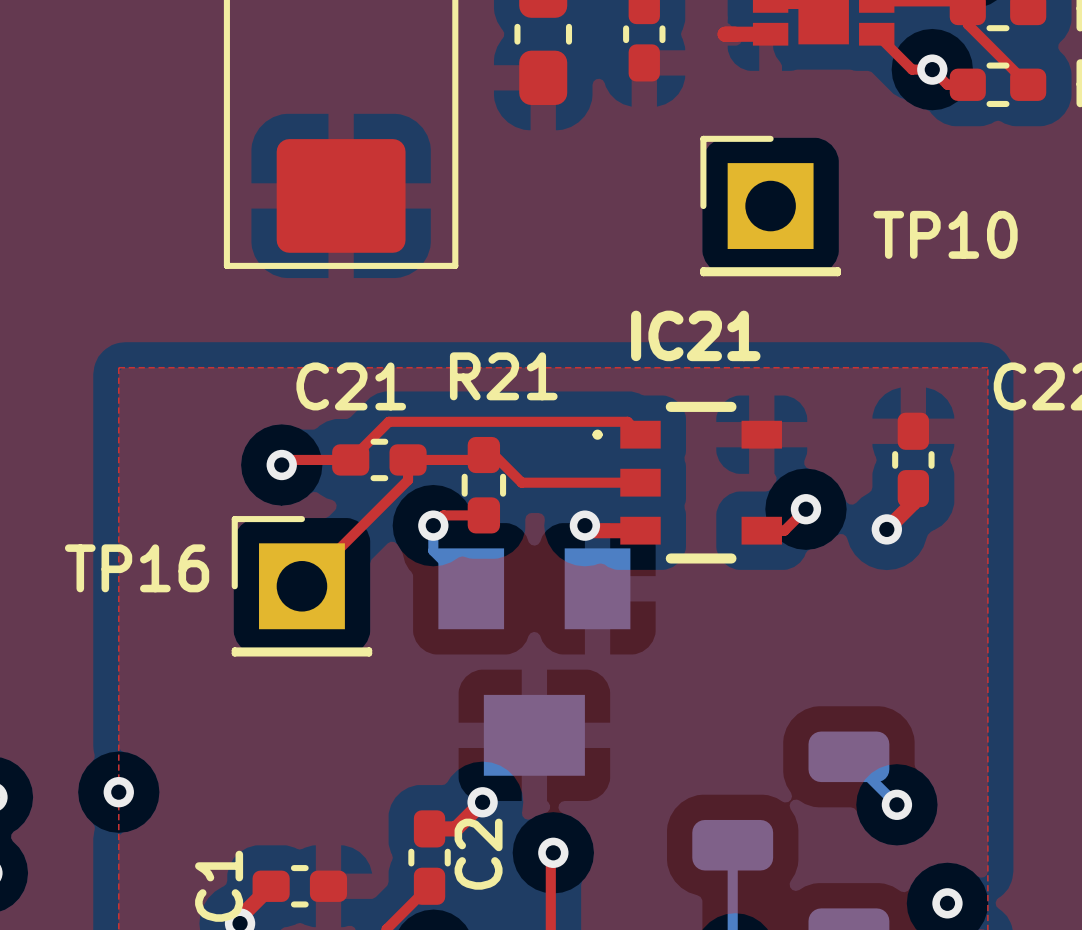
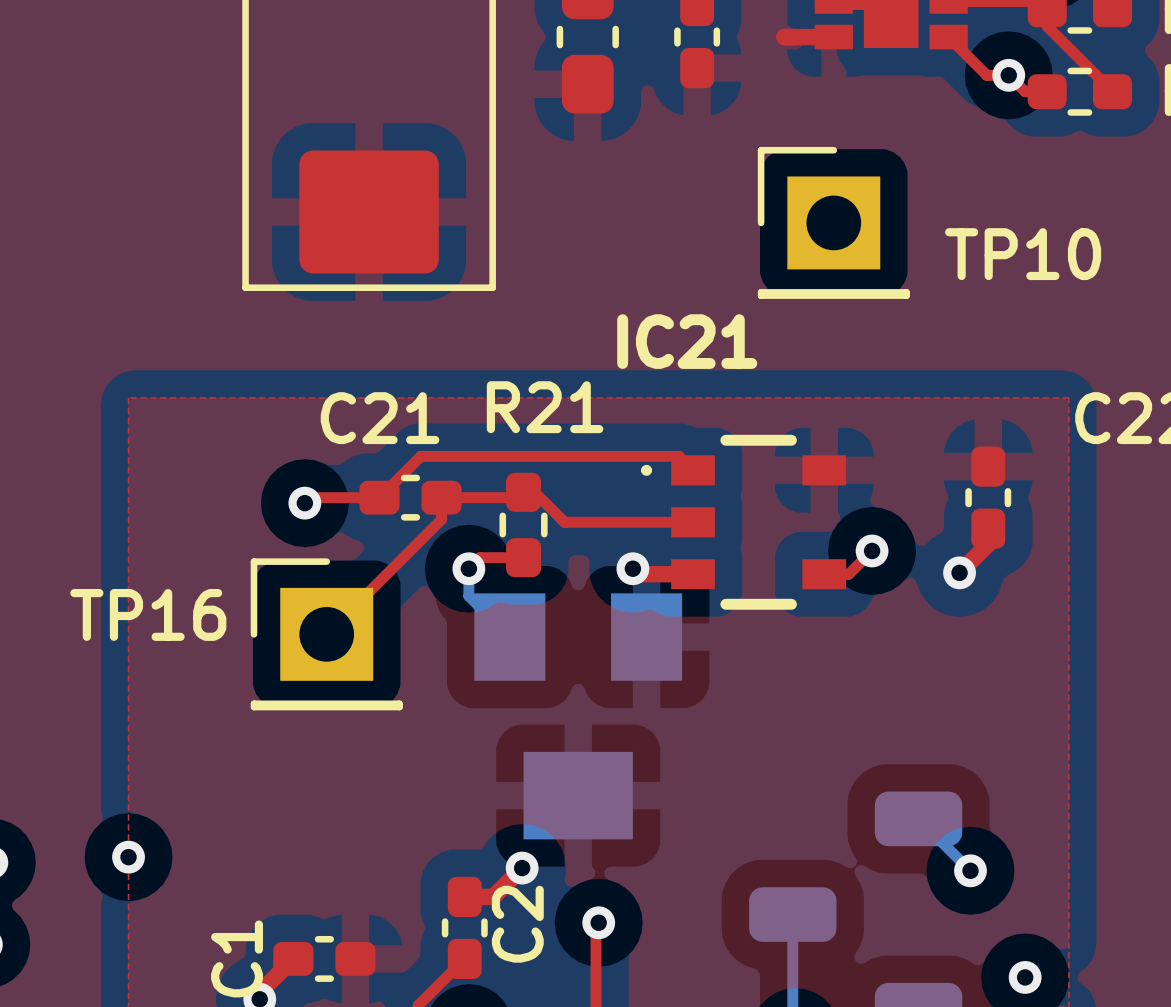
IC21 name position: IC21 (695, 335) -> IC21 (687, 341)

